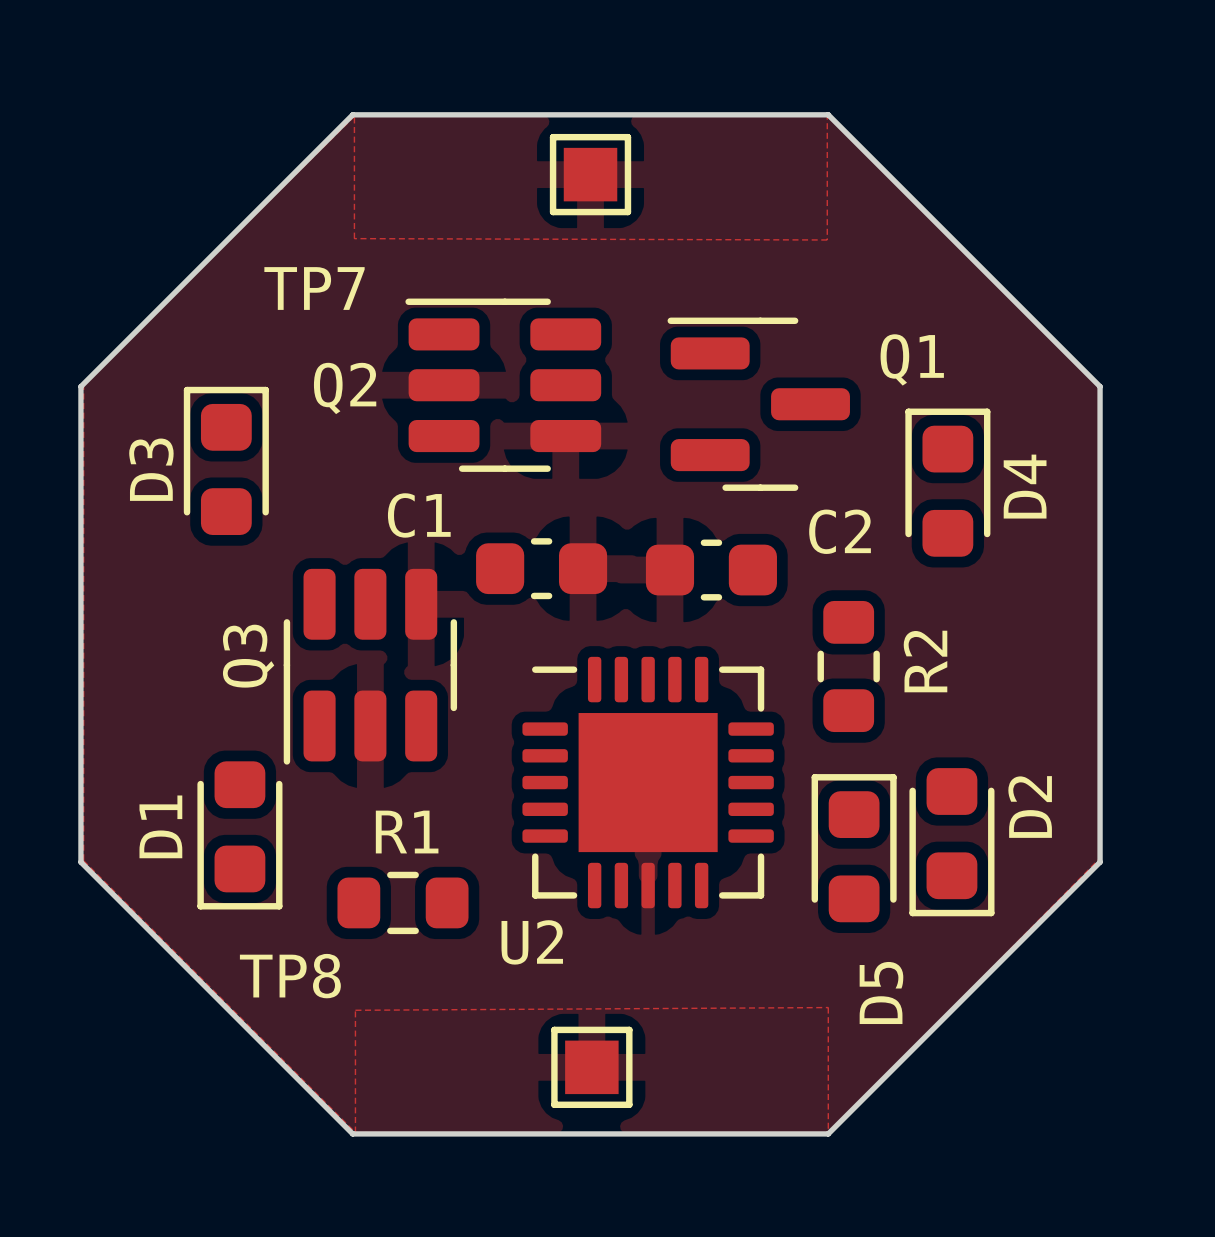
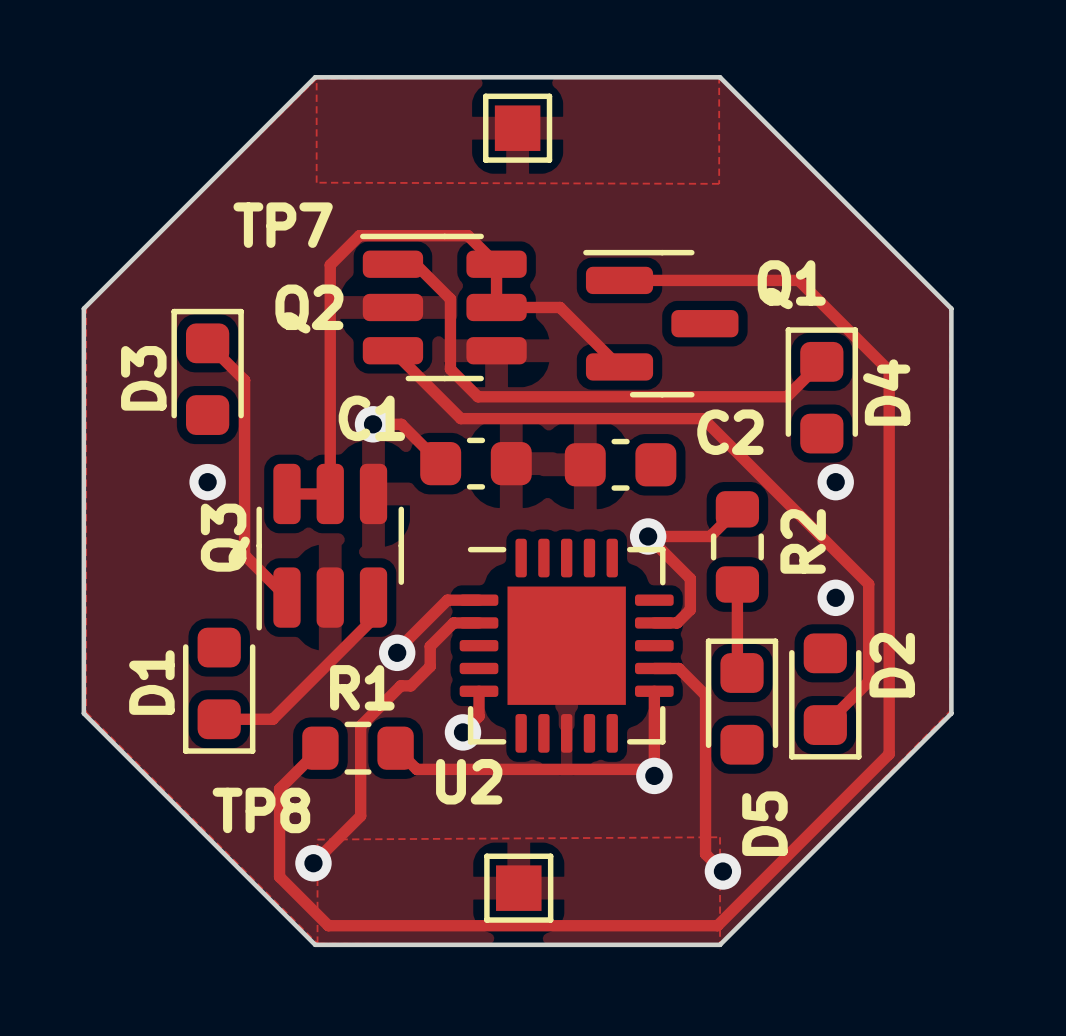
track: none -> (392, 264) (415, 264) (450, 299) (450, 369) (478, 396) (786, 396) (821, 361)
track: none -> (619, 280) (798, 280) (889, 370) (889, 754) (717, 925) (328, 925) (279, 876) (279, 789) (320, 748)
track: none -> (207, 343) (244, 380) (244, 555) (286, 597)
track: none -> (392, 350) (460, 418) (703, 418) (868, 584) (868, 681) (825, 725)
track: none -> (619, 366) (560, 307) (496, 307) (496, 264) (468, 235) (359, 235) (330, 265) (330, 493) (286, 493)
track: none -> (373, 424) (401, 424) (440, 463)
via: none -> (373, 424)
via: none -> (207, 482)
via: none -> (835, 482)
track: none -> (737, 509) (710, 536) (648, 536) (690, 578) (690, 609) (677, 622) (654, 622)
via: none -> (648, 536)
track: none -> (737, 584) (737, 668) (742, 672)
track: none -> (373, 597) (373, 618) (272, 719) (219, 719)
via: none -> (835, 597)
track: none -> (479, 600) (447, 600) (397, 650) (397, 652)
track: none -> (479, 622) (453, 622) (430, 646) (430, 666) (410, 685) (400, 685) (360, 725) (360, 816) (313, 863)
via: none -> (397, 652)
track: none -> (654, 668) (678, 668) (705, 695) (705, 854) (722, 871)
track: none -> (479, 691) (479, 716) (462, 732)
track: none -> (654, 691) (654, 775)
via: none -> (462, 732)
track: none -> (395, 748) (416, 769) (654, 769)
via: none -> (654, 775)
via: none -> (313, 863)
via: none -> (722, 871)

